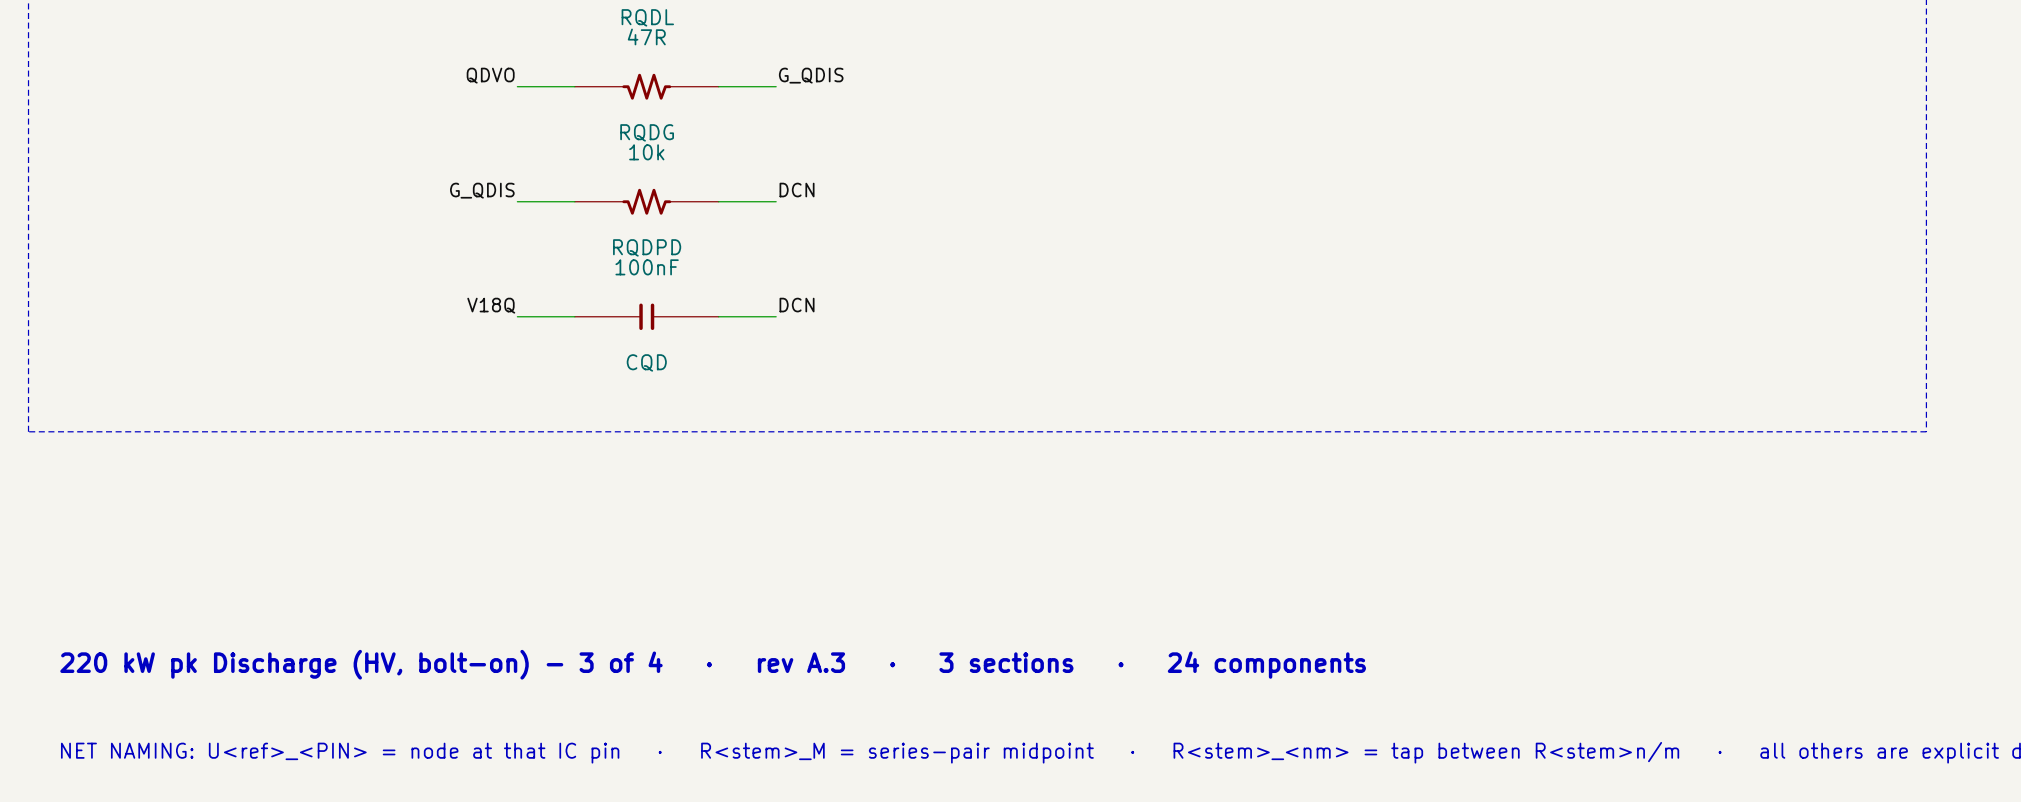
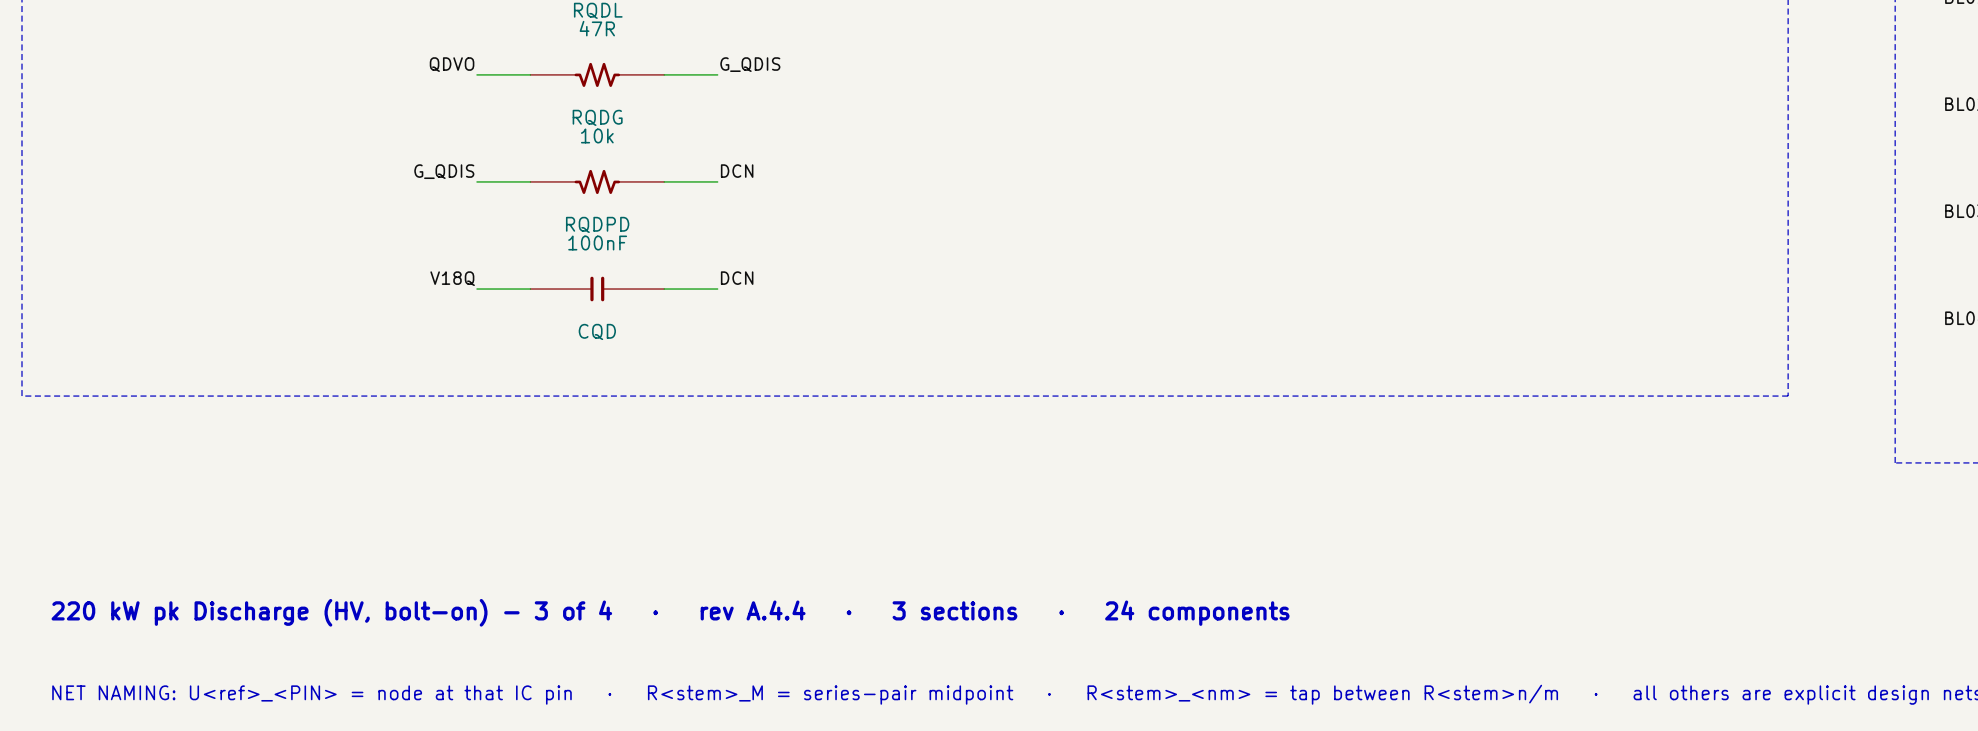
text: 220 kW pk Discharge (HV, bolt-on) - 3 of 4 · rev A.3 · 3 sections · 24 components (713, 664) -> 220 kW pk Discharge (HV, bolt-on) - 3 of 4 · rev A.4.4 · 3 sections · 24 components (670, 612)

